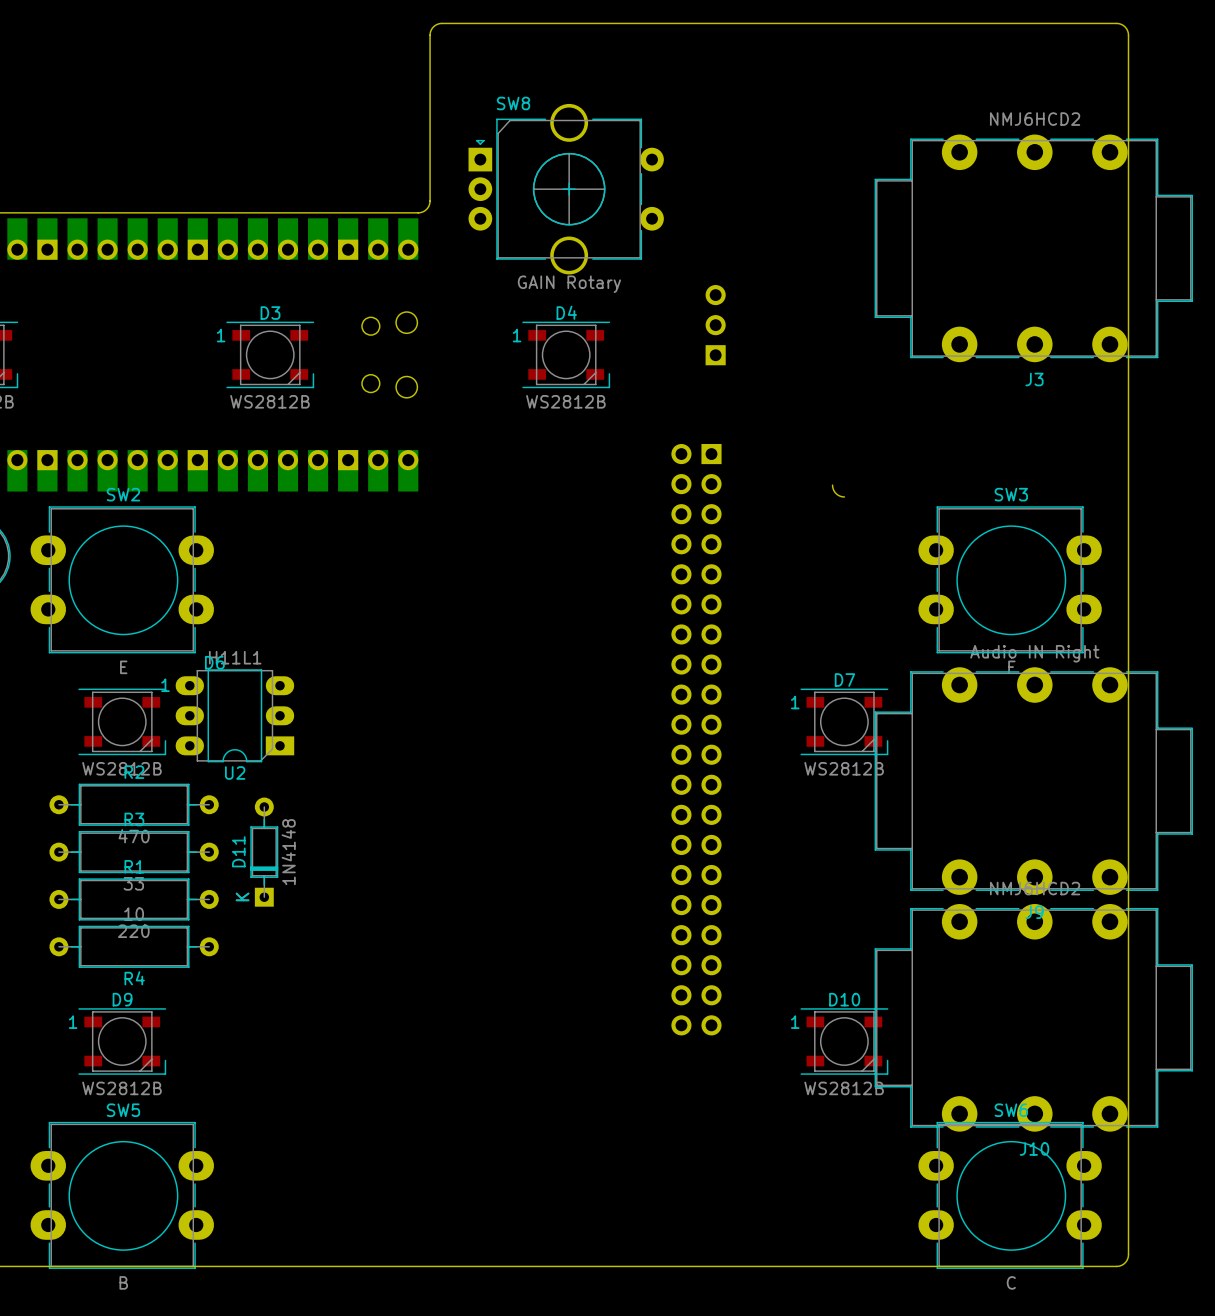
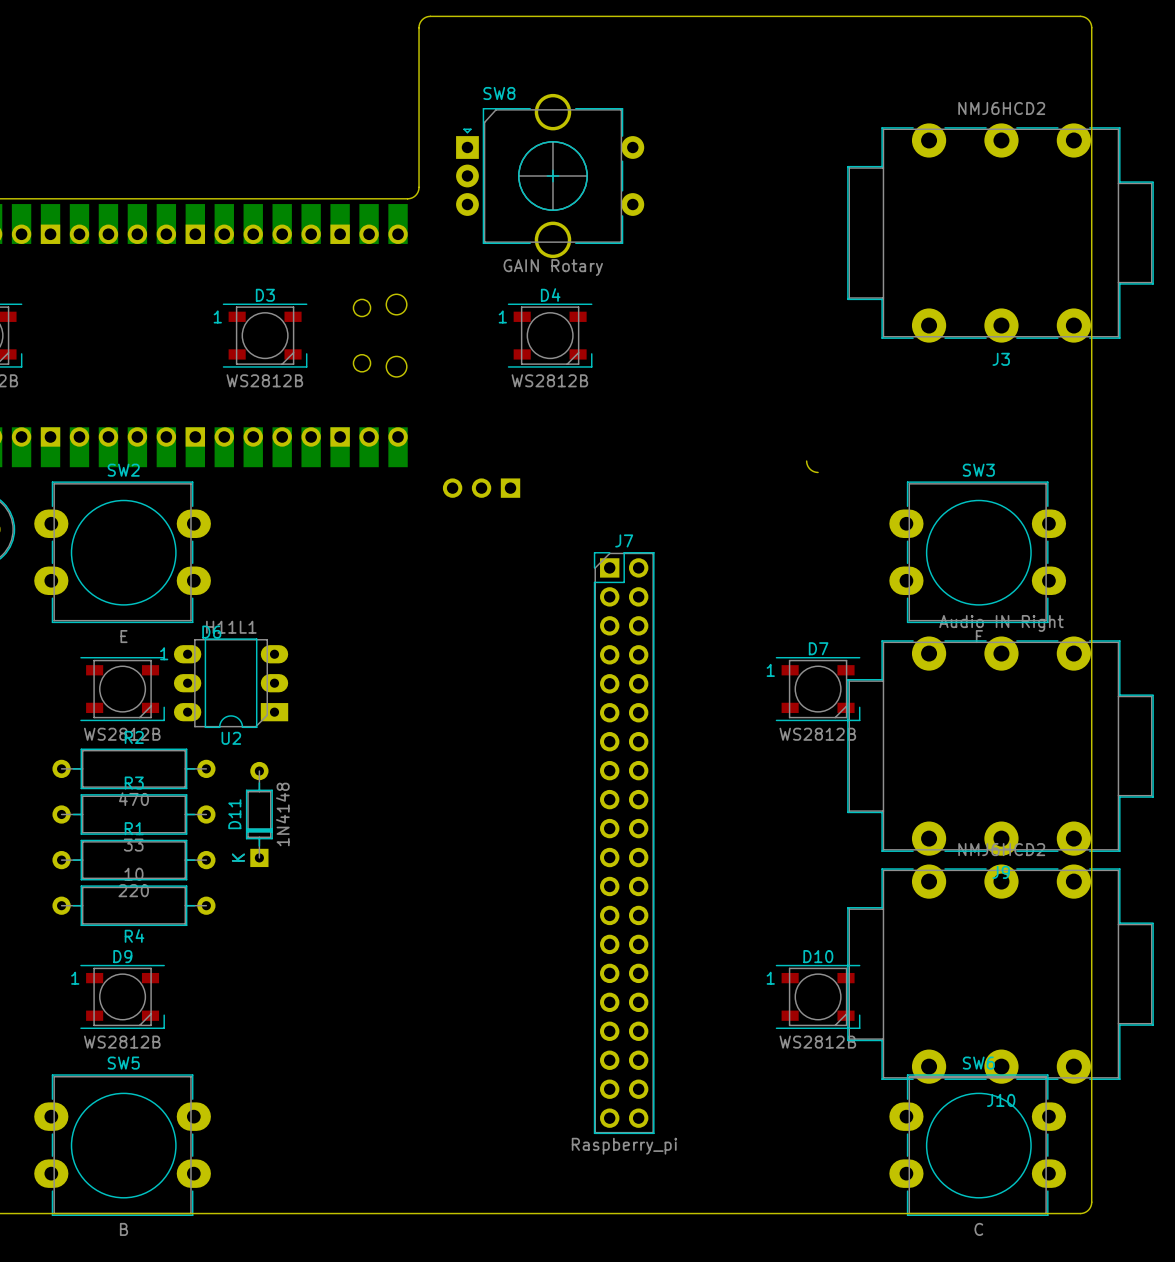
part rotation: 0° (715, 325) -> 90° counterclockwise (481, 488)
part position: (715, 325) -> (481, 488)
J7 side: bottom (696, 739) -> top (624, 843)

